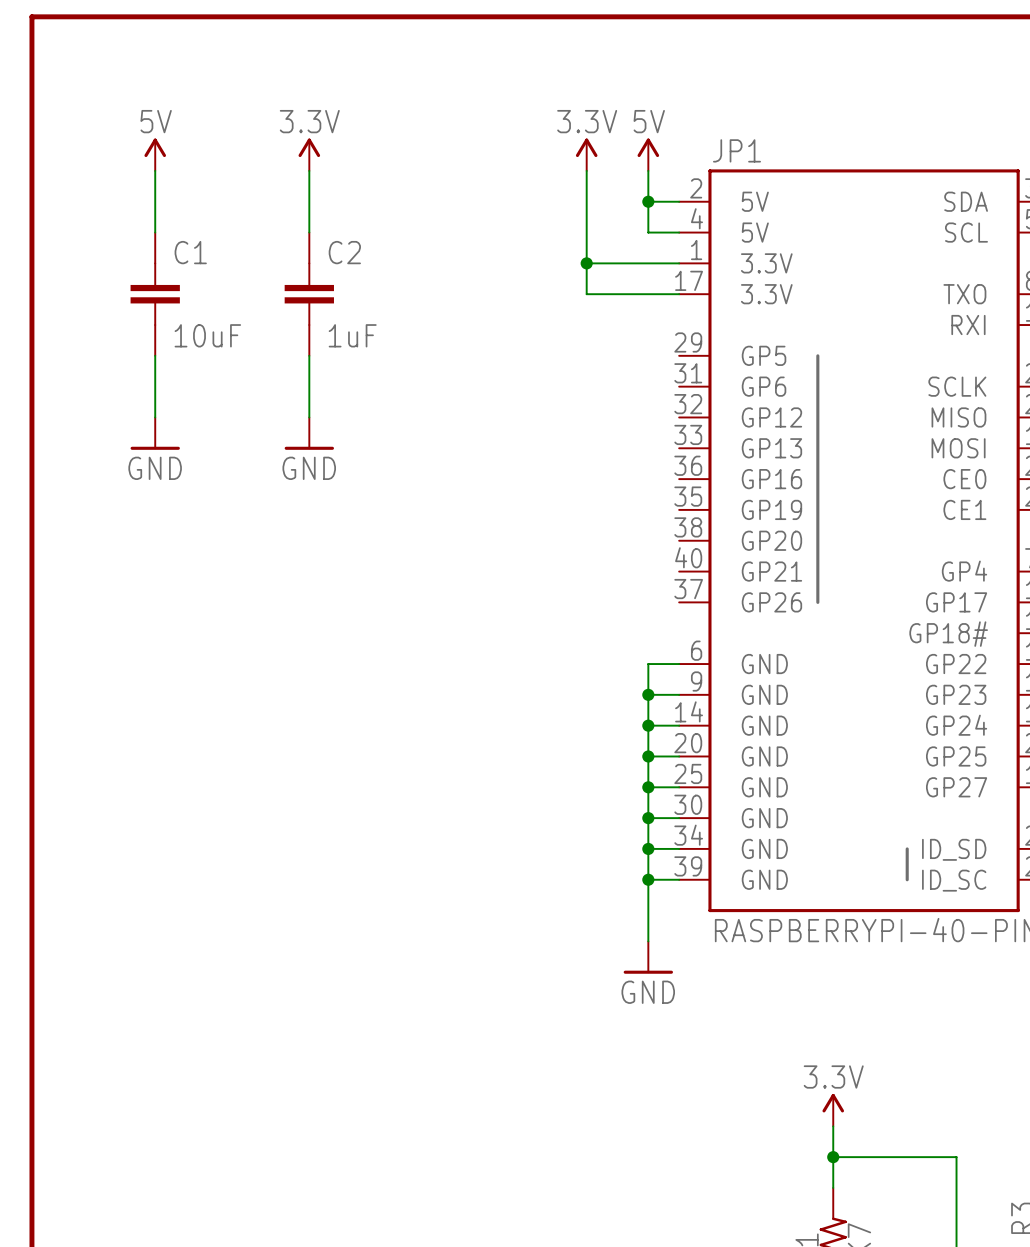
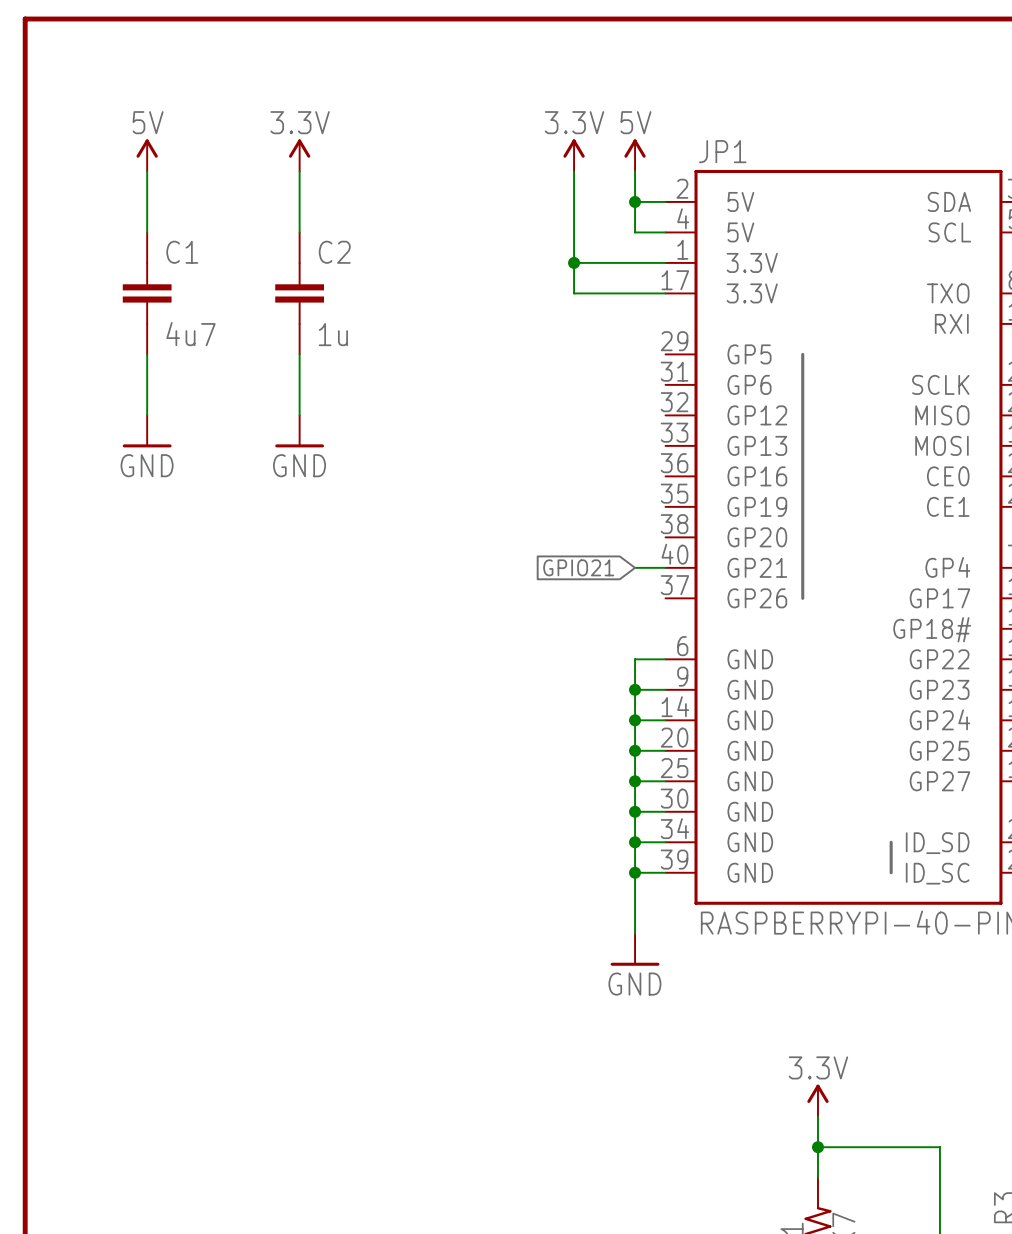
C1 value: 10uF (207, 335) -> 4u7 (190, 334)
C2 value: 1uF (352, 335) -> 1u (333, 334)
global label: none -> GPIO21 (578, 567)
wire: none -> (635, 567) (665, 567)

